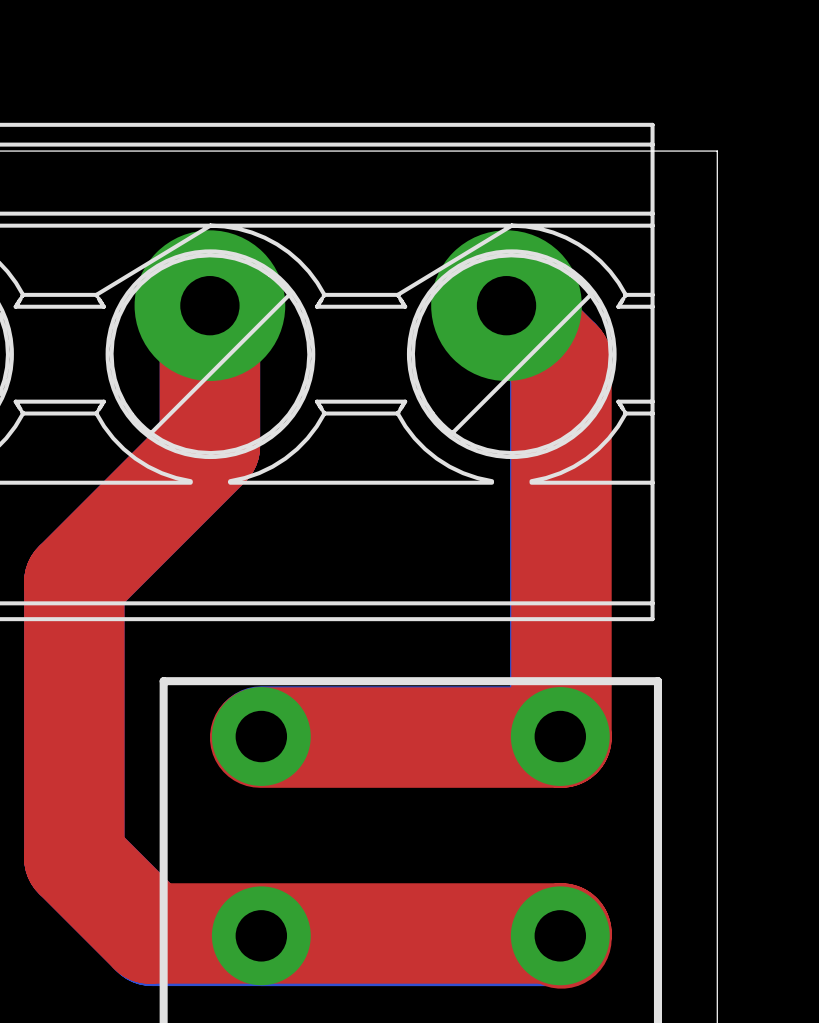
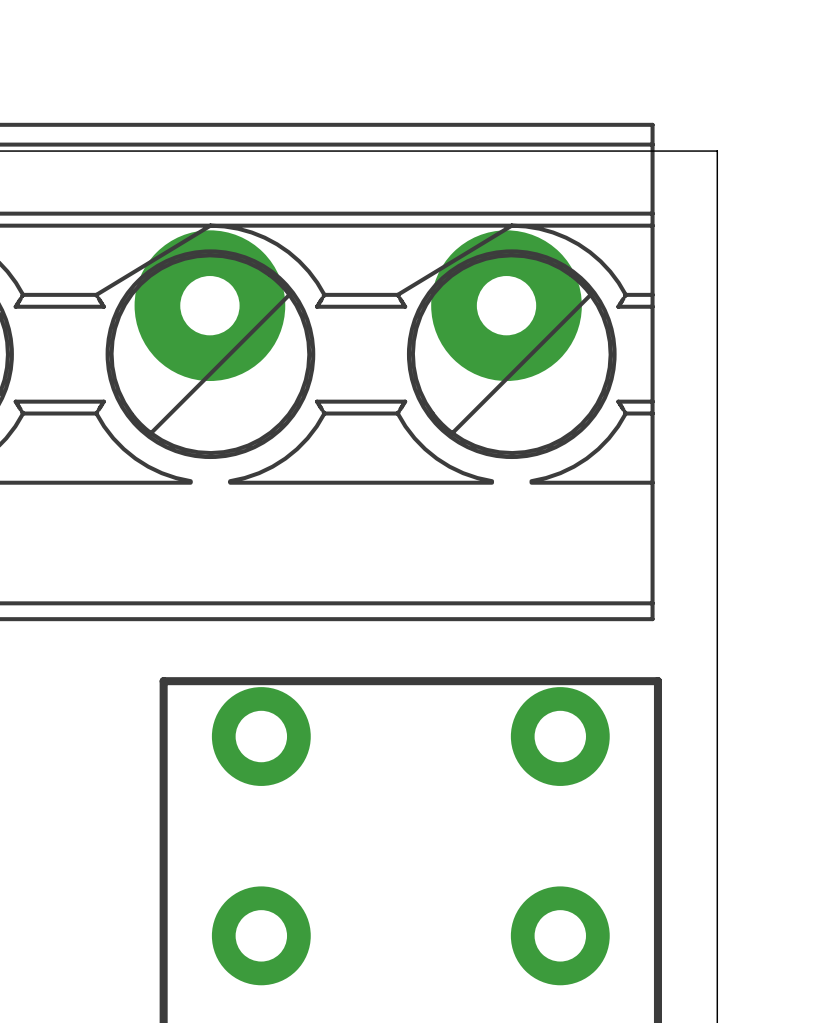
top track: (501, 300) (561, 360) (561, 737) (260, 737) -> none
top track: (209, 305) (209, 446) (74, 581) (74, 858) (149, 933) (561, 933) (561, 938) -> none

